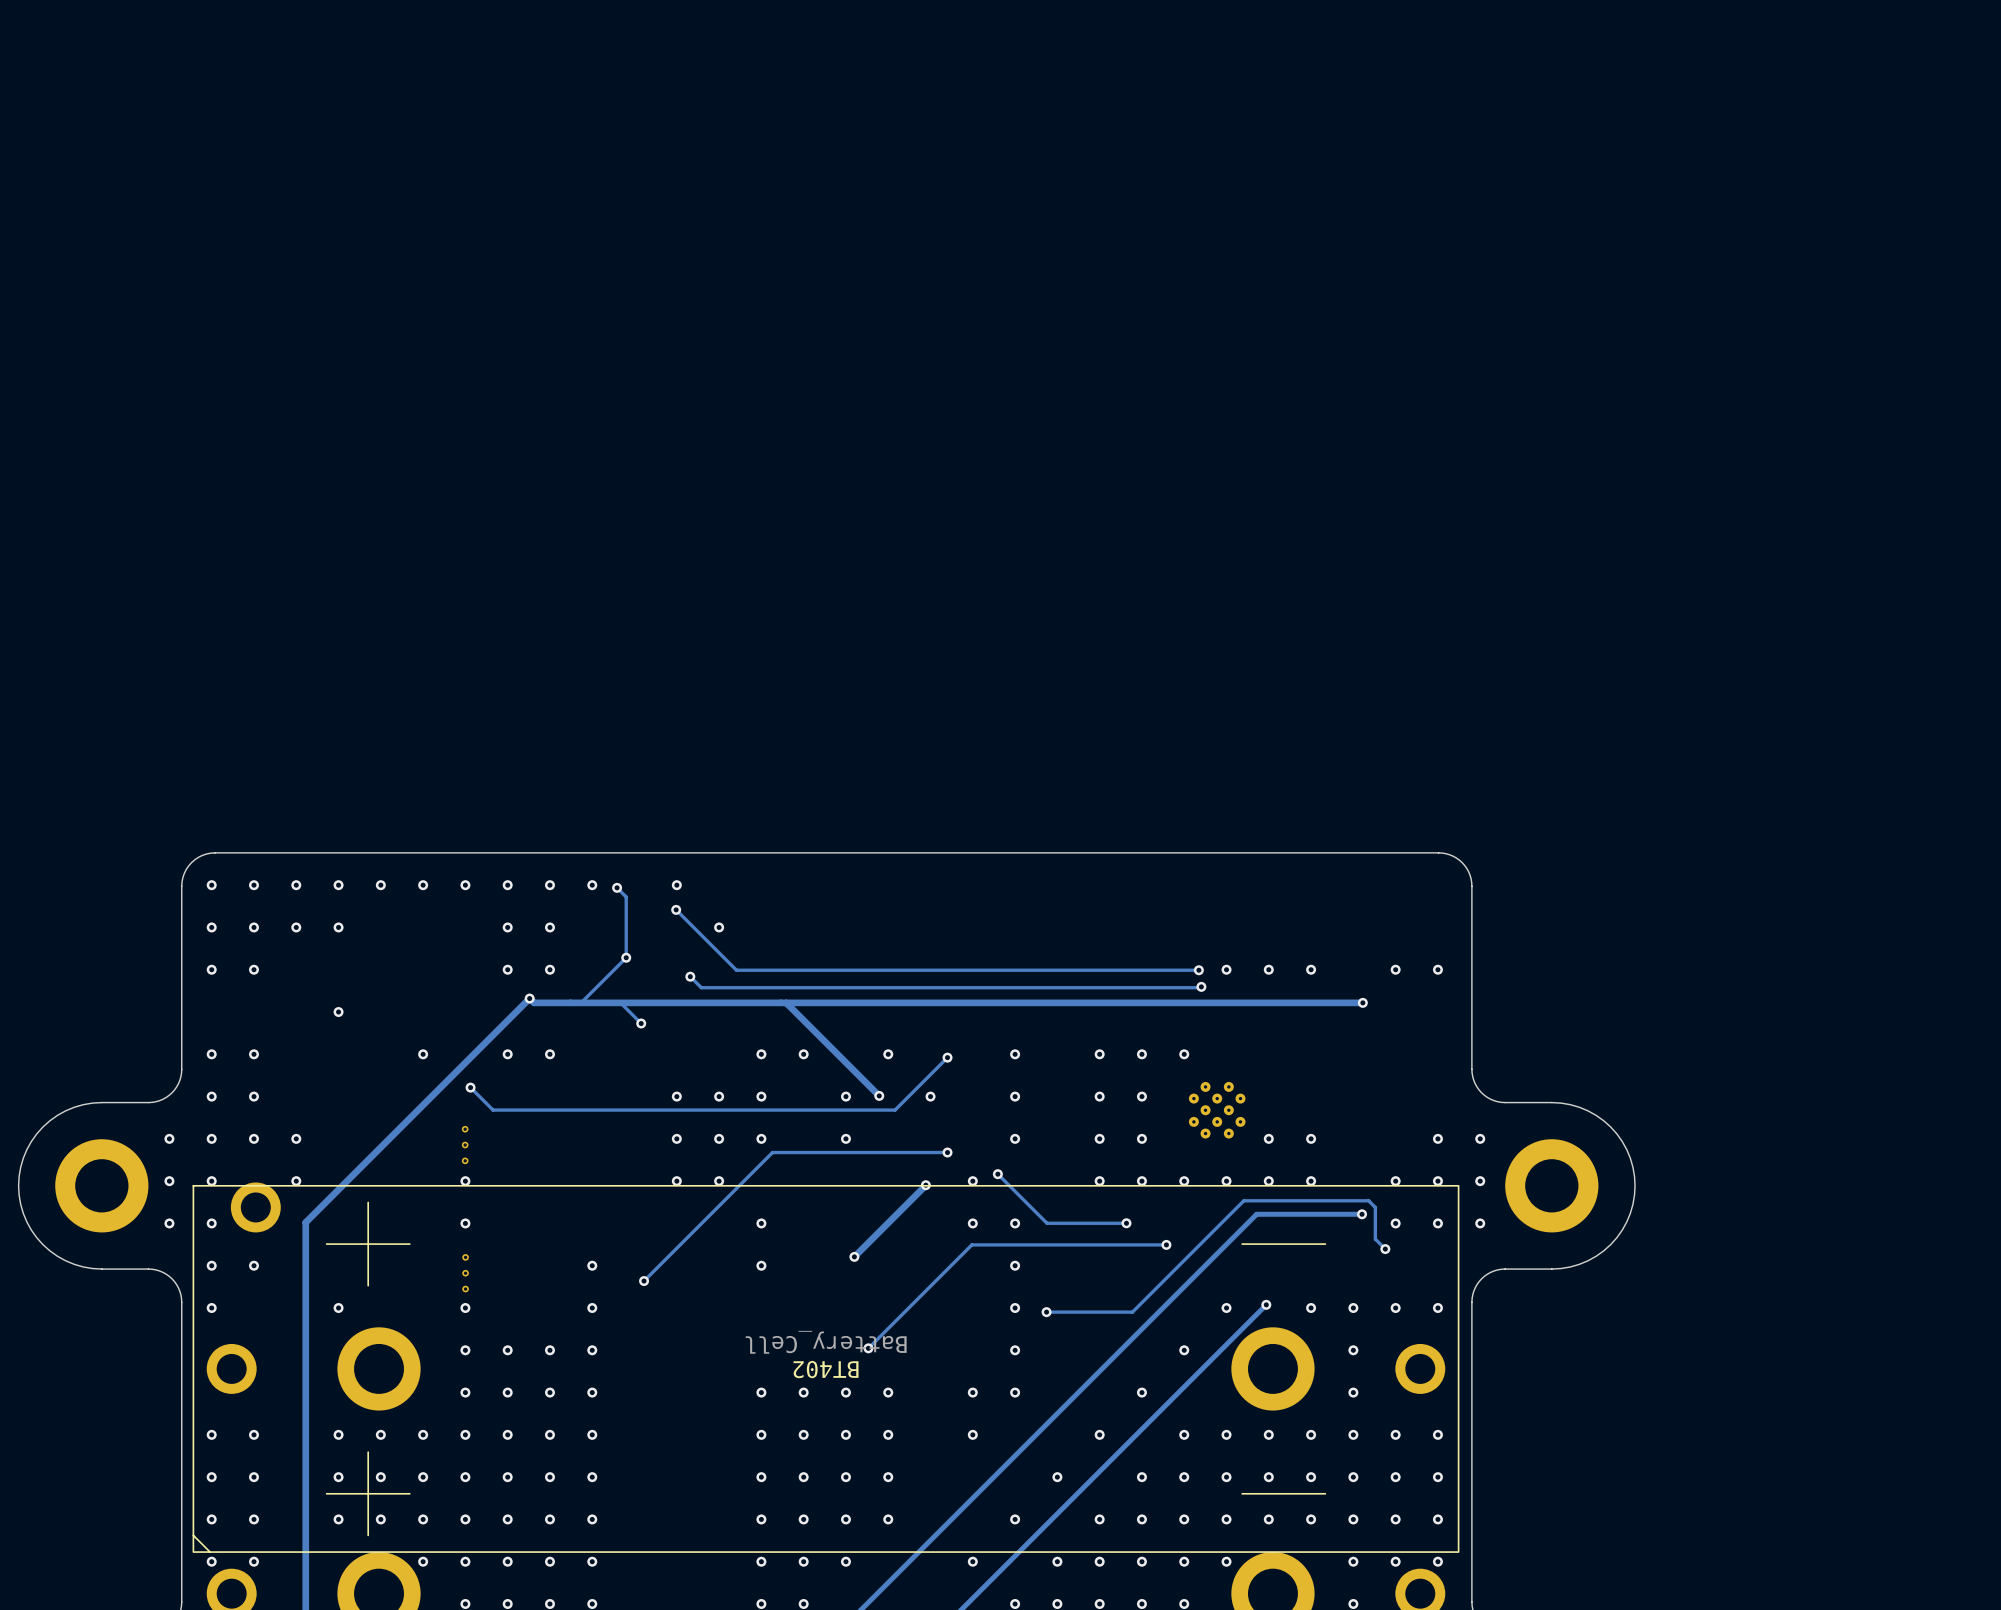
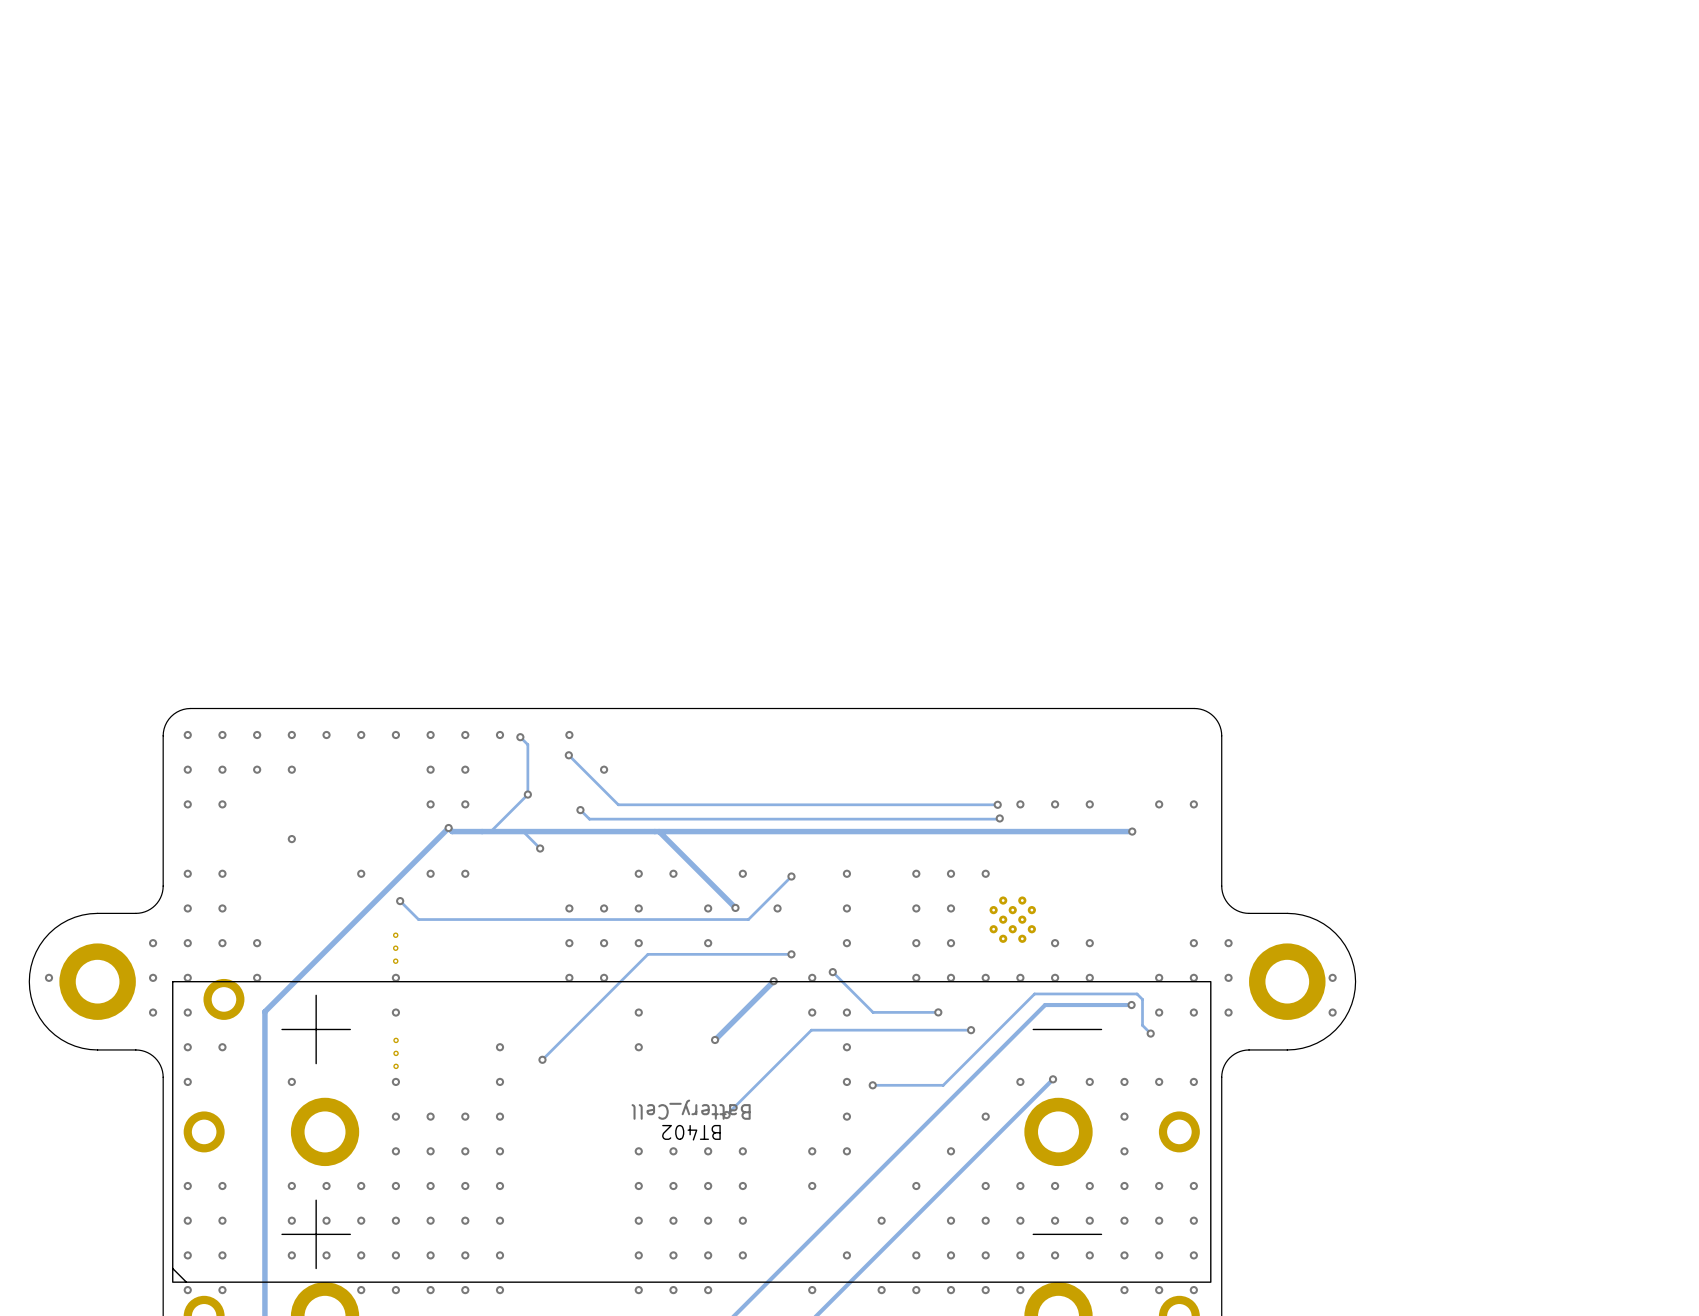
via: none -> (48, 977)
via: none -> (1332, 977)
via: none -> (1332, 1012)

